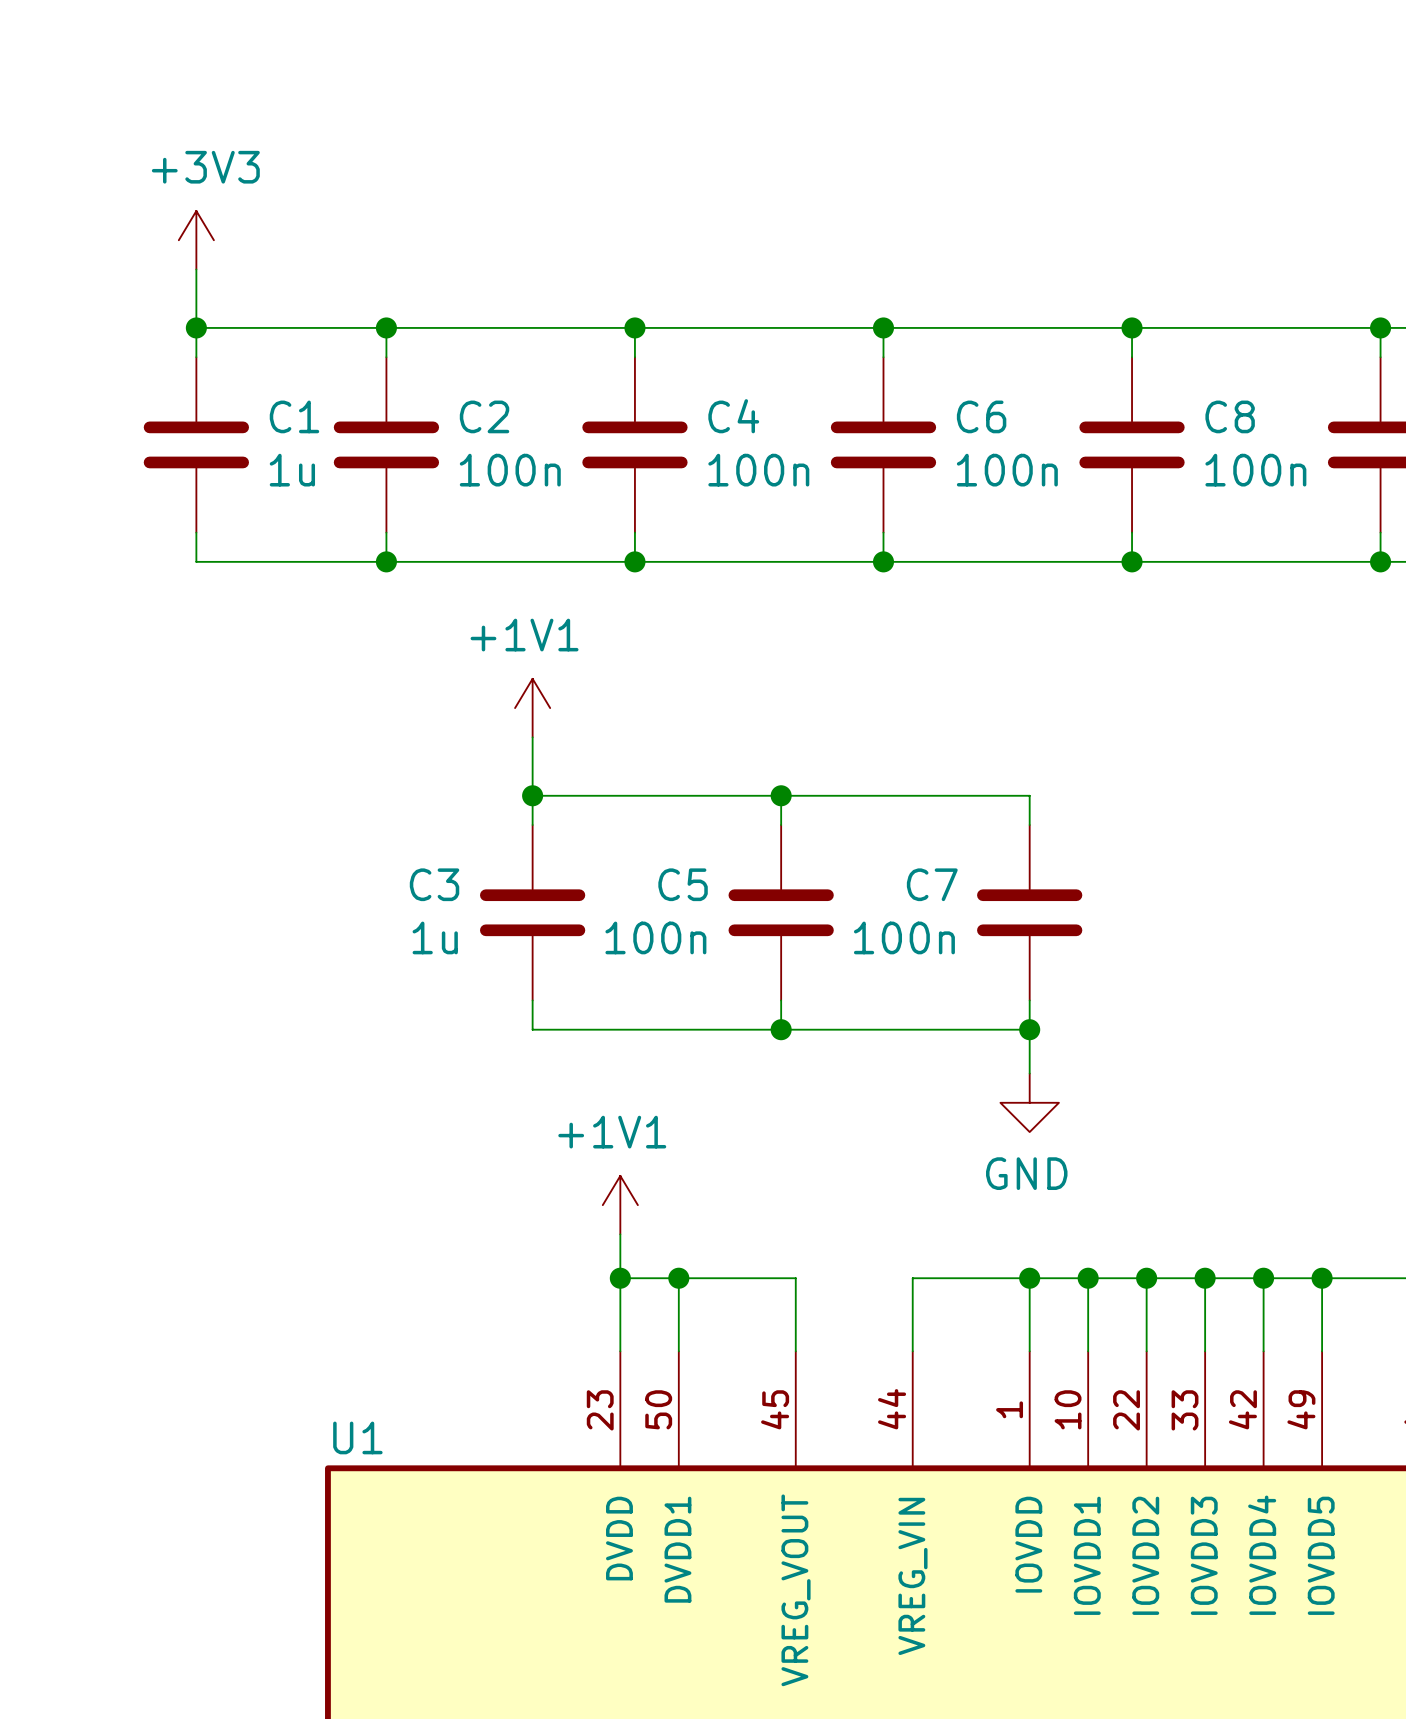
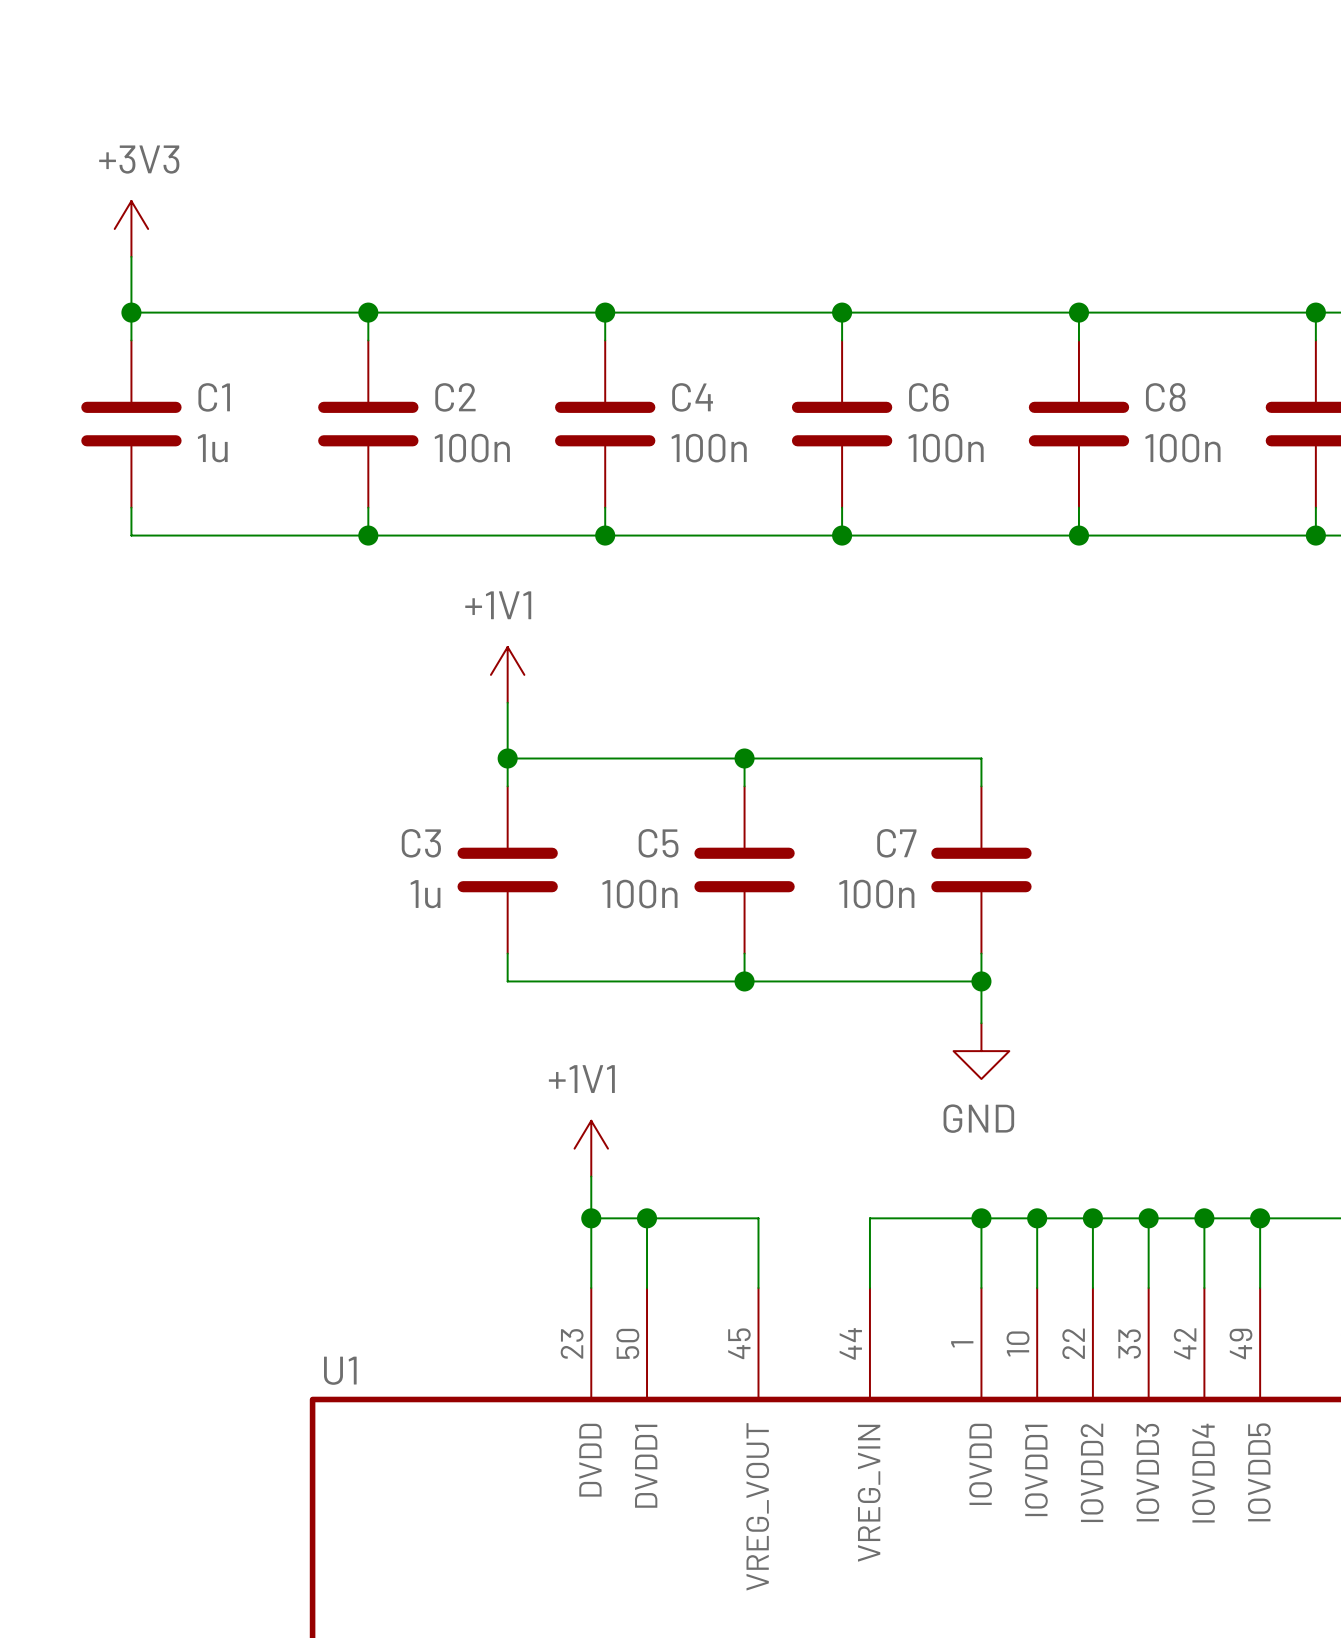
power symbol position: +3V3 (196, 240) -> +3V3 (131, 228)
wire: (196, 269) (196, 357) -> (131, 256) (131, 340)
wire: none -> (131, 312) (187, 312)
junction position: (196, 327) -> (131, 312)
C1 position: (196, 444) -> (131, 424)
wire: (196, 532) (196, 561) -> (131, 507) (131, 535) (187, 535)

